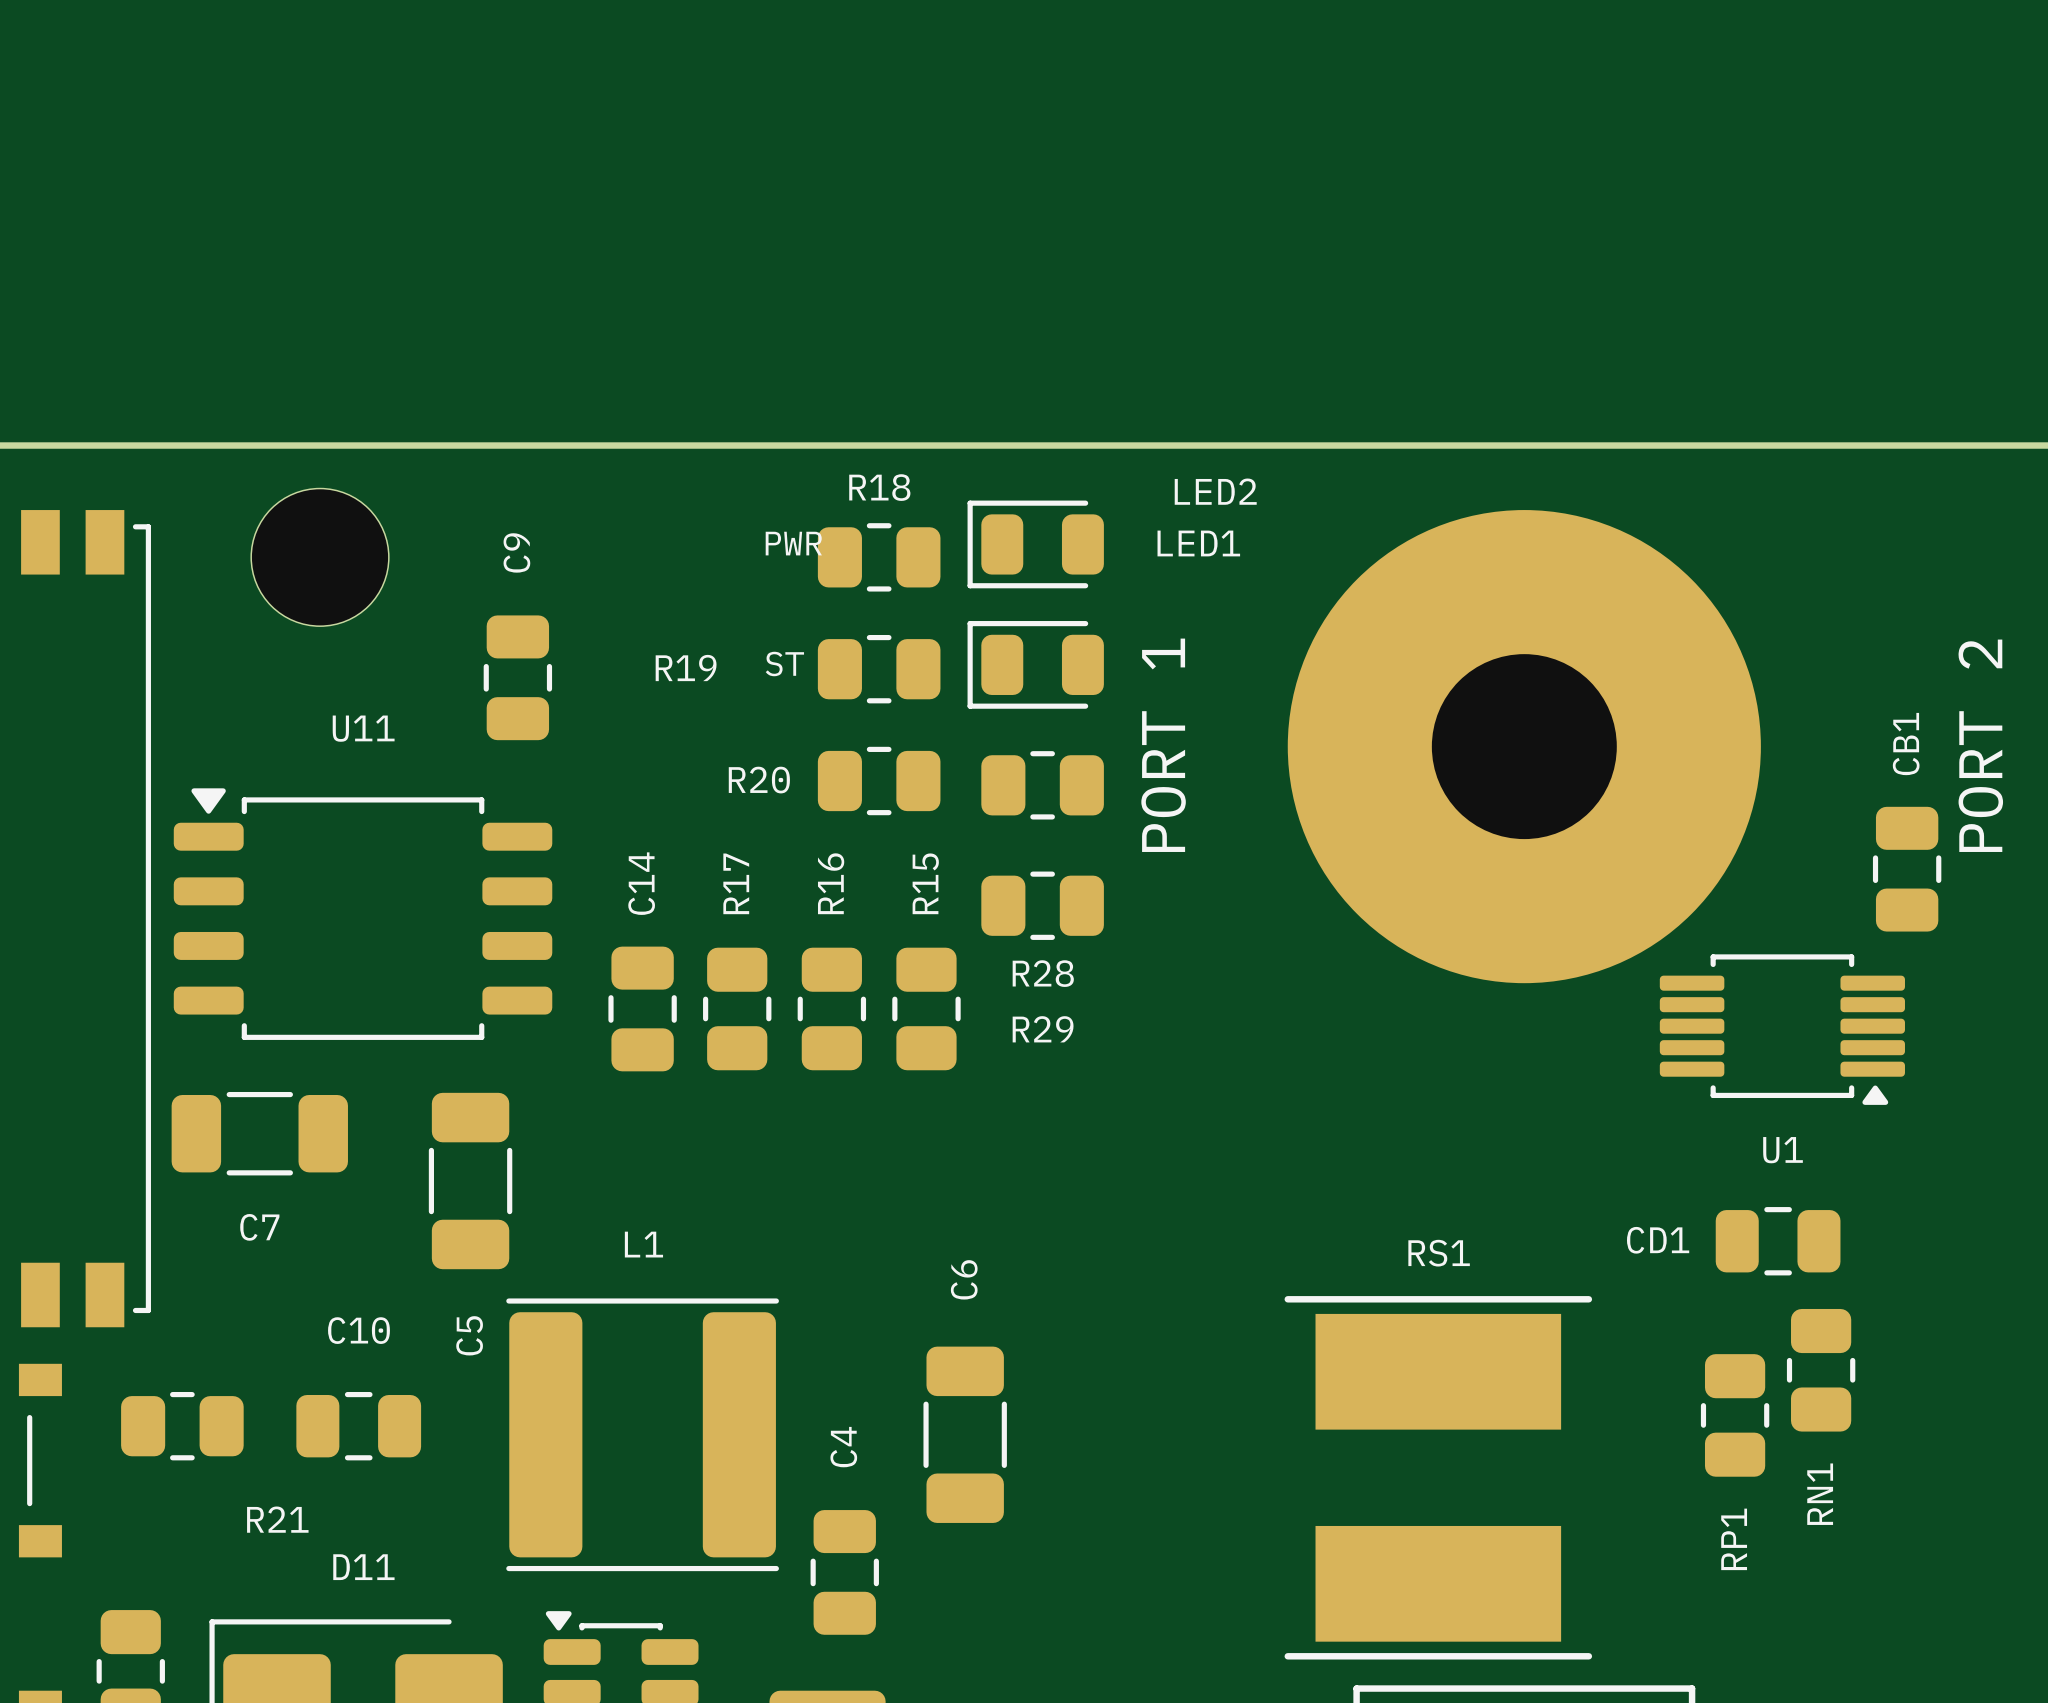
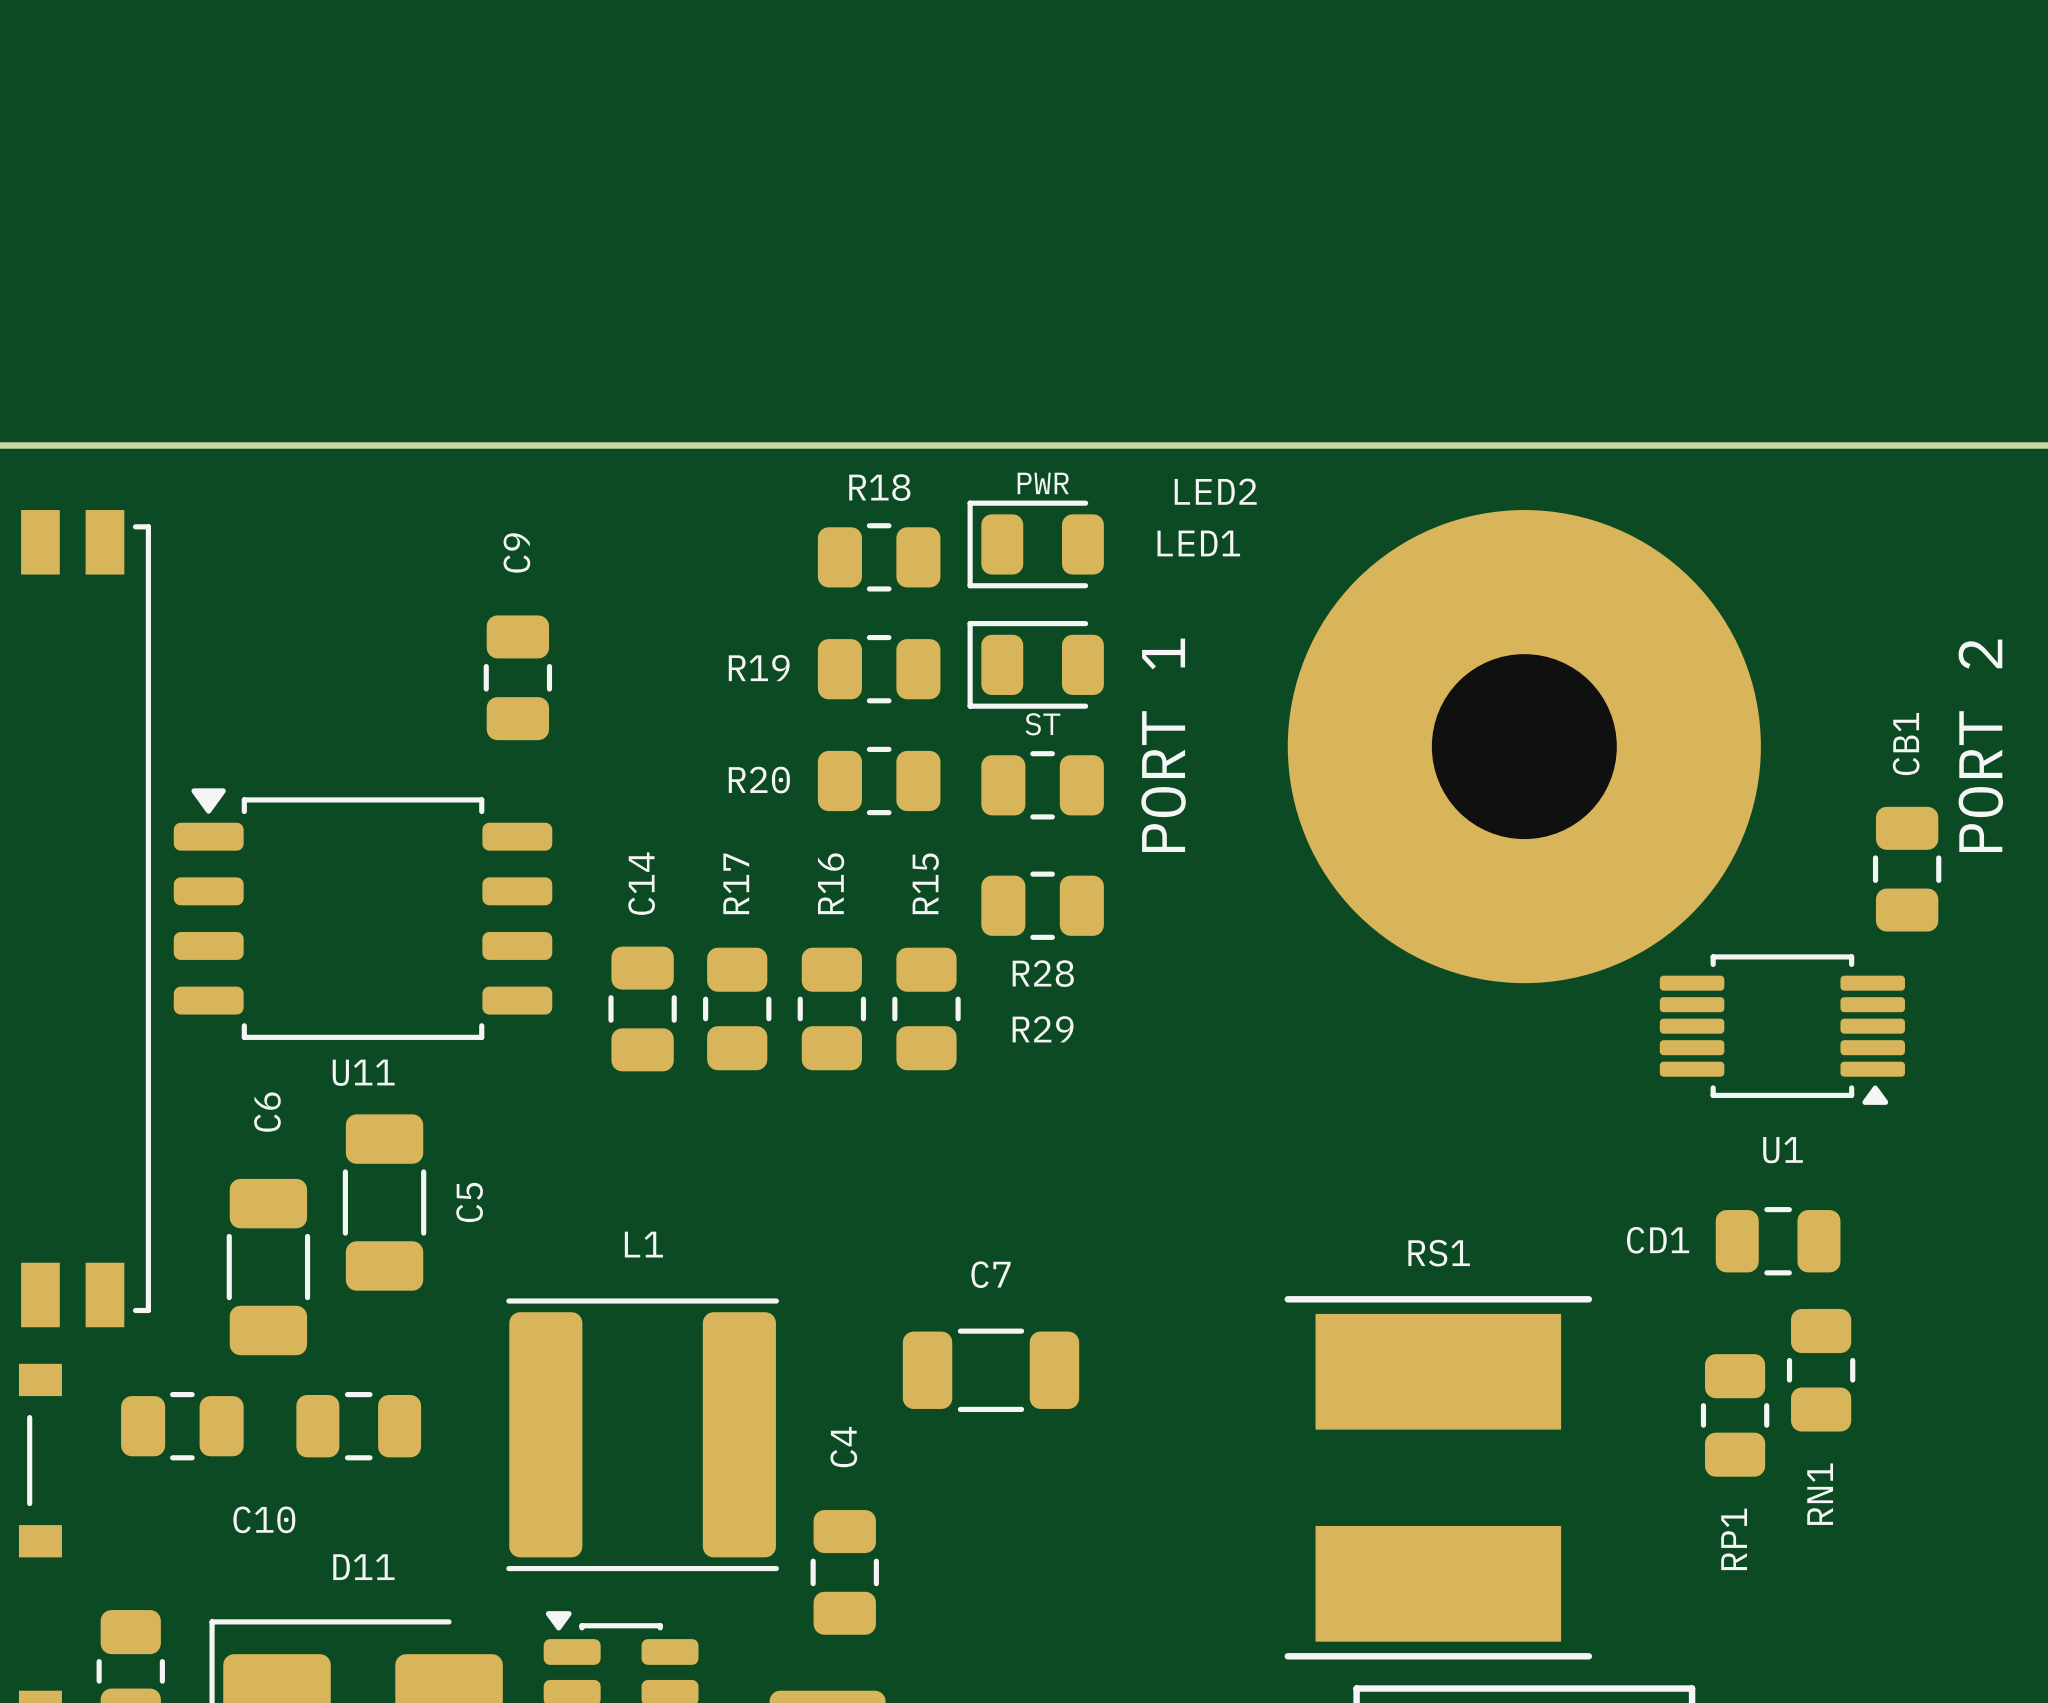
text position: PWR (793, 543) -> PWR (1043, 483)
part: (320, 557) -> none
text position: ST (784, 664) -> ST (1042, 724)
R19 name position: R19 (686, 667) -> R19 (759, 667)
U11 name position: U11 (363, 728) -> U11 (363, 1072)
C7 position: (259, 1133) -> (990, 1370)
C5 position: (470, 1181) -> (384, 1202)
C7 name position: C7 (259, 1227) -> C7 (991, 1274)
C10 name position: C10 (358, 1330) -> C10 (264, 1519)
C5 name position: C5 (469, 1335) -> C5 (469, 1202)
C6 position: (965, 1434) -> (268, 1267)
R21 name: R21 (277, 1519) -> none

